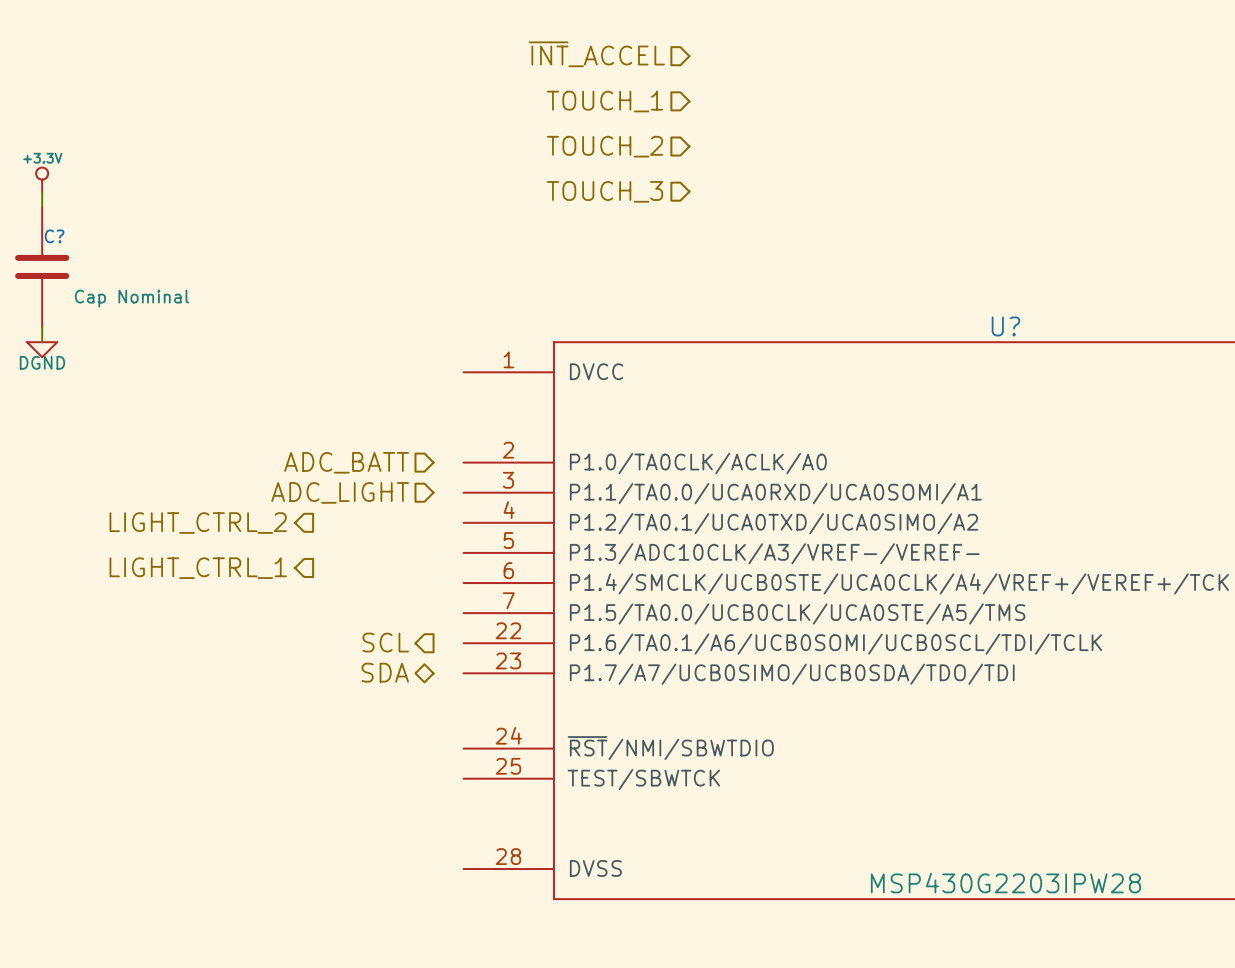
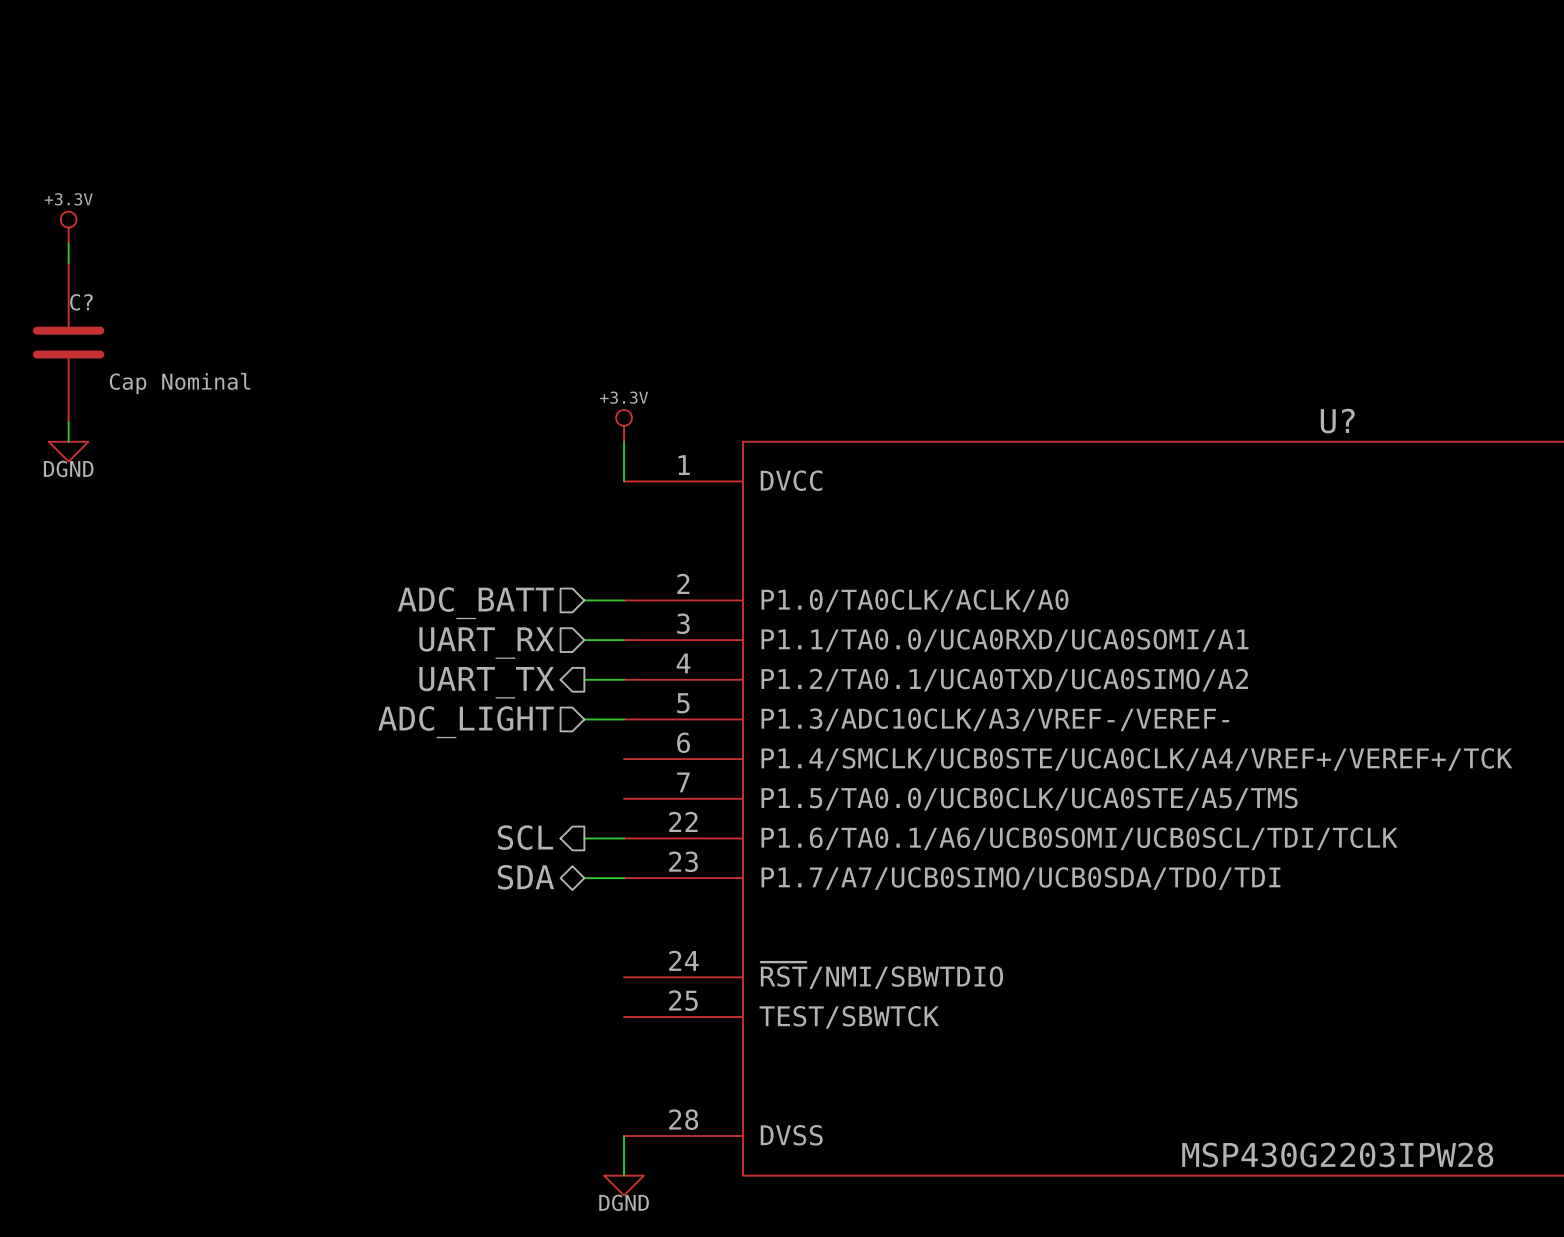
hierarchical label: ~{INT}_ACCEL (596, 54) -> none
hierarchical label: TOUCH_1 (605, 101) -> none
hierarchical label: TOUCH_2 (605, 146) -> none
hierarchical label: TOUCH_3 (605, 191) -> none
power symbol: none -> +3.3V (624, 425)
wire: none -> (624, 441) (624, 481)
wire: none -> (584, 600) (624, 600)
hierarchical label: ADC_LIGHT (340, 492) -> UART_RX (486, 643)
wire: none -> (584, 640) (624, 640)
wire: none -> (584, 679) (624, 679)
hierarchical label: LIGHT_CTRL_2 (198, 523) -> none
hierarchical label: none -> UART_TX (486, 682)
wire: none -> (584, 719) (624, 719)
hierarchical label: none -> ADC_LIGHT (466, 722)
hierarchical label: LIGHT_CTRL_1 (198, 568) -> none
wire: none -> (584, 838) (624, 838)
wire: none -> (584, 878) (624, 878)
wire: none -> (624, 1136) (624, 1175)
power symbol: none -> DGND (624, 1185)

